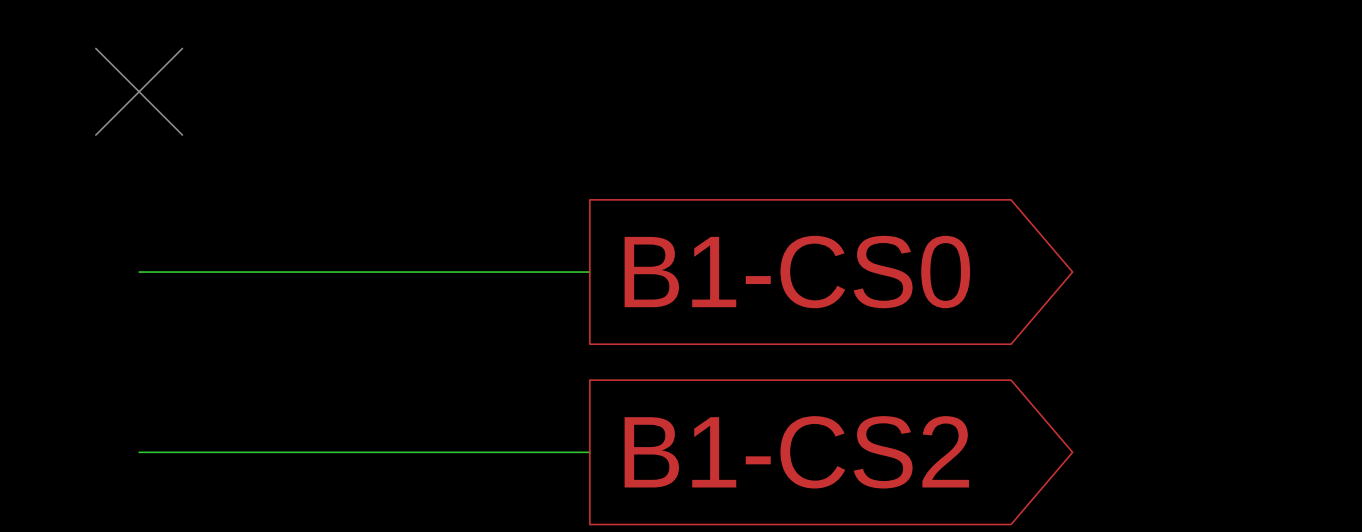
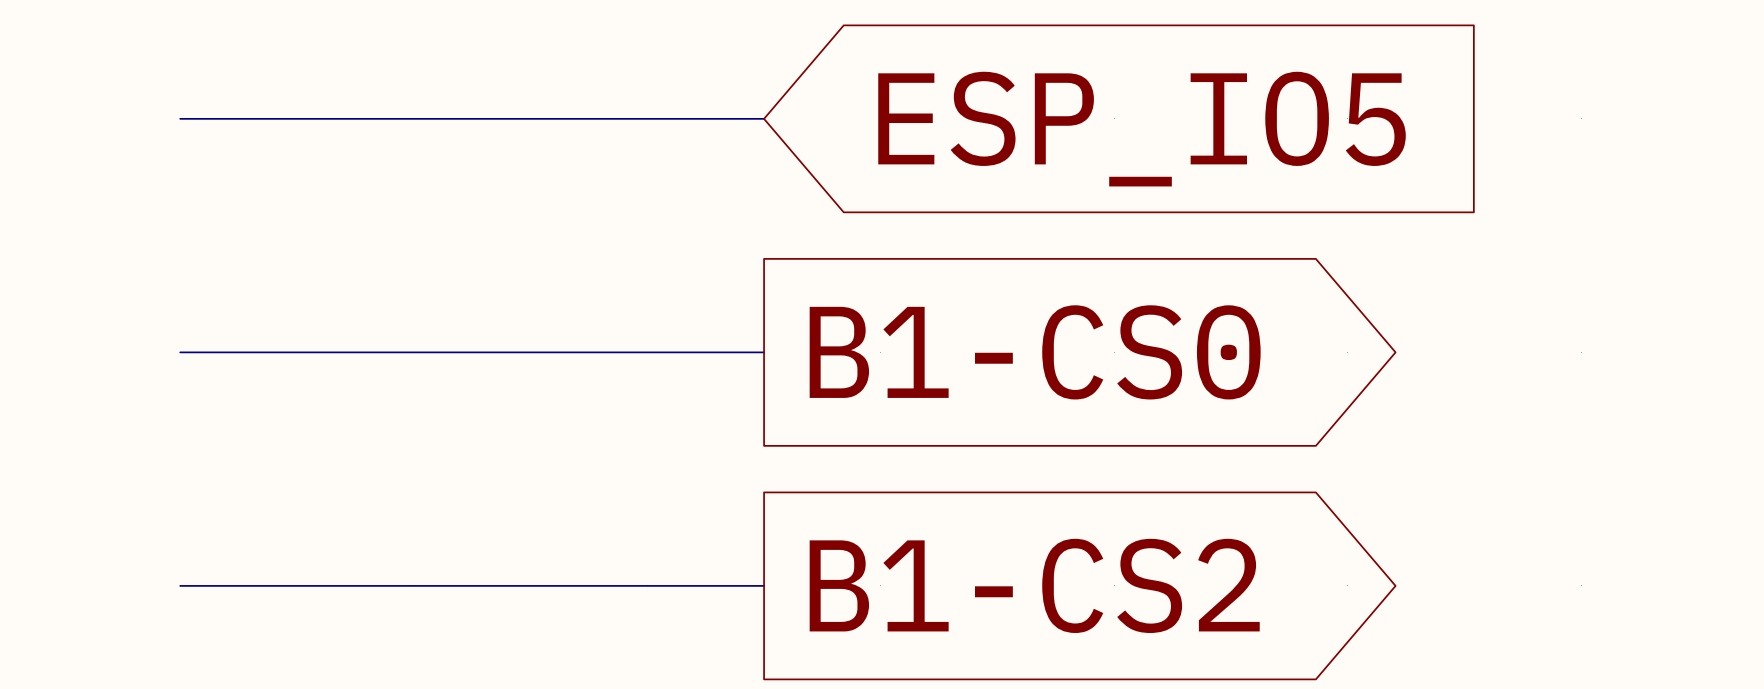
wire: none -> (180, 118) (764, 118)
no-connect mark: (139, 91) -> none
global label: none -> ESP_IO5 (1142, 129)

